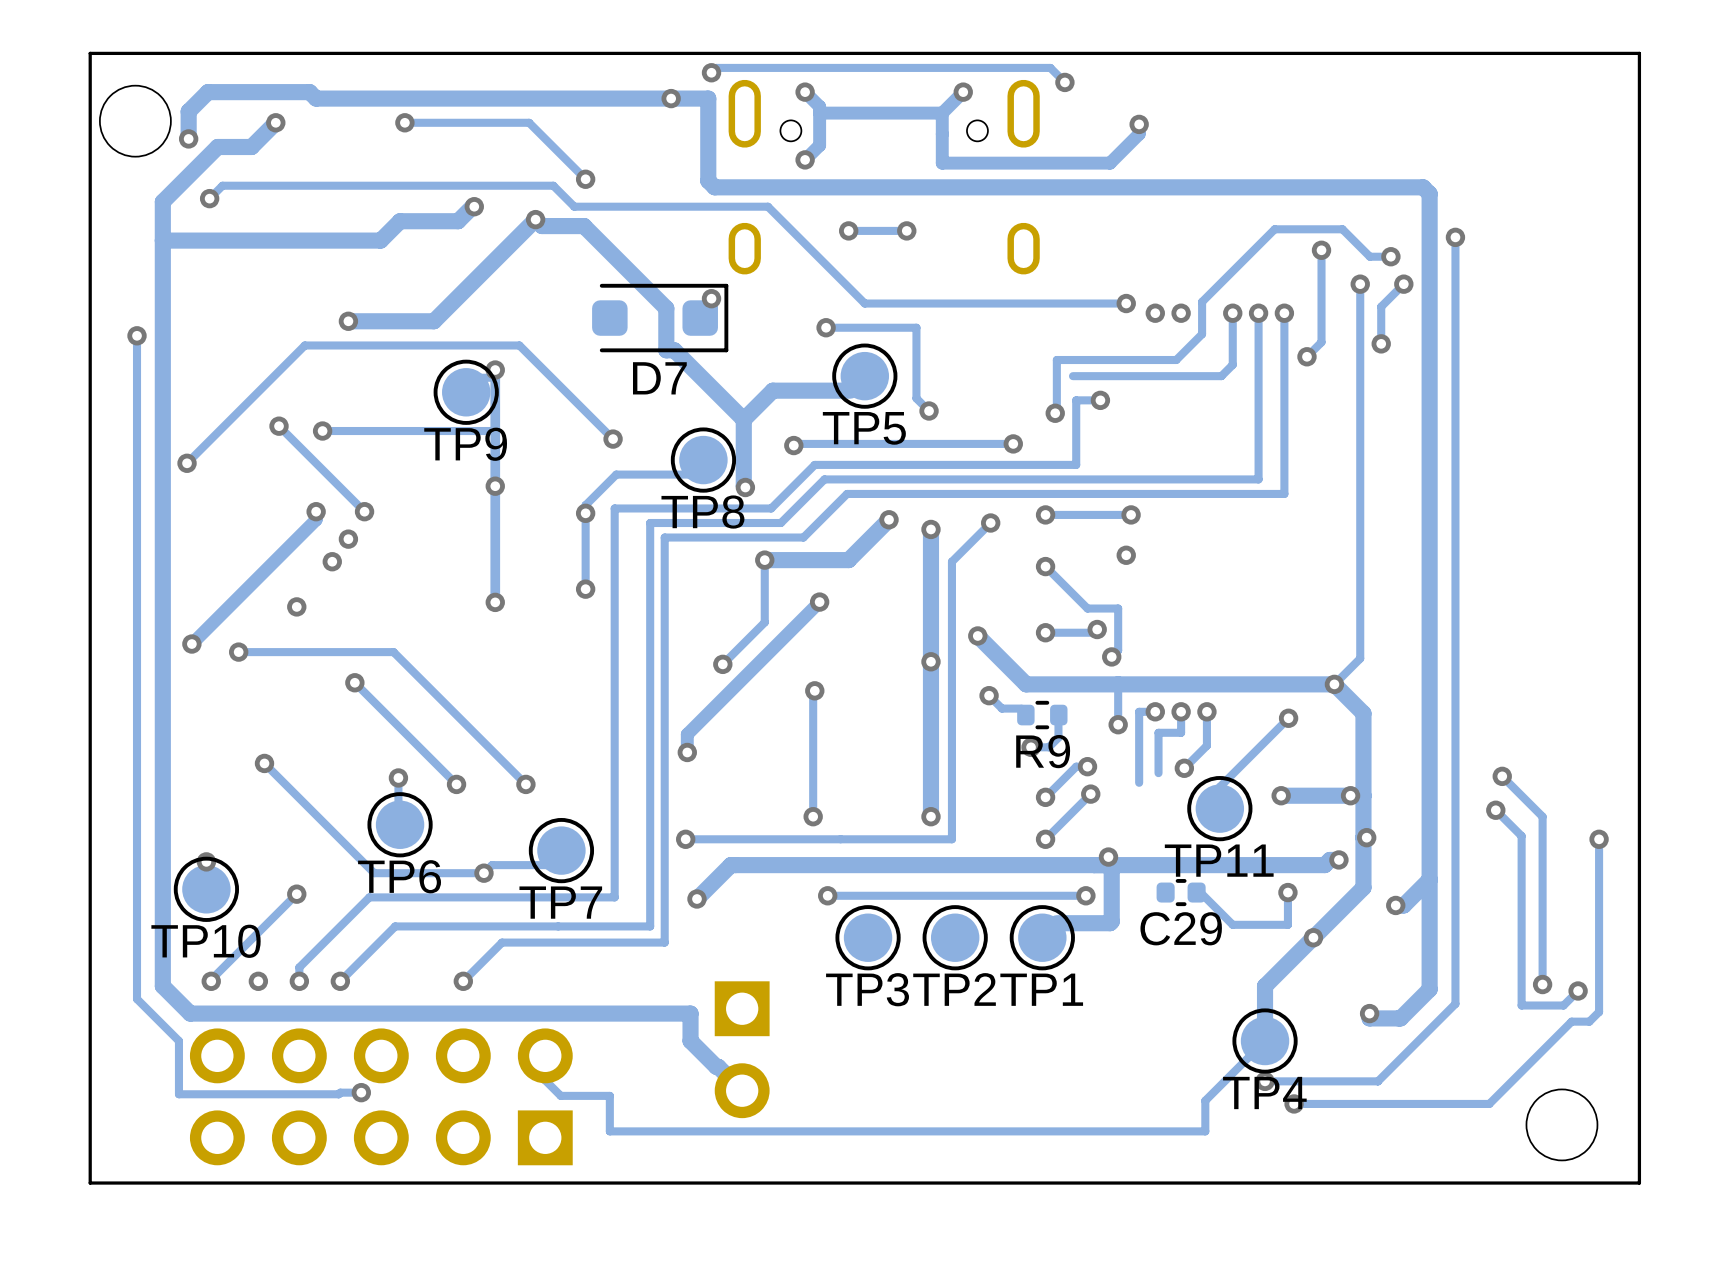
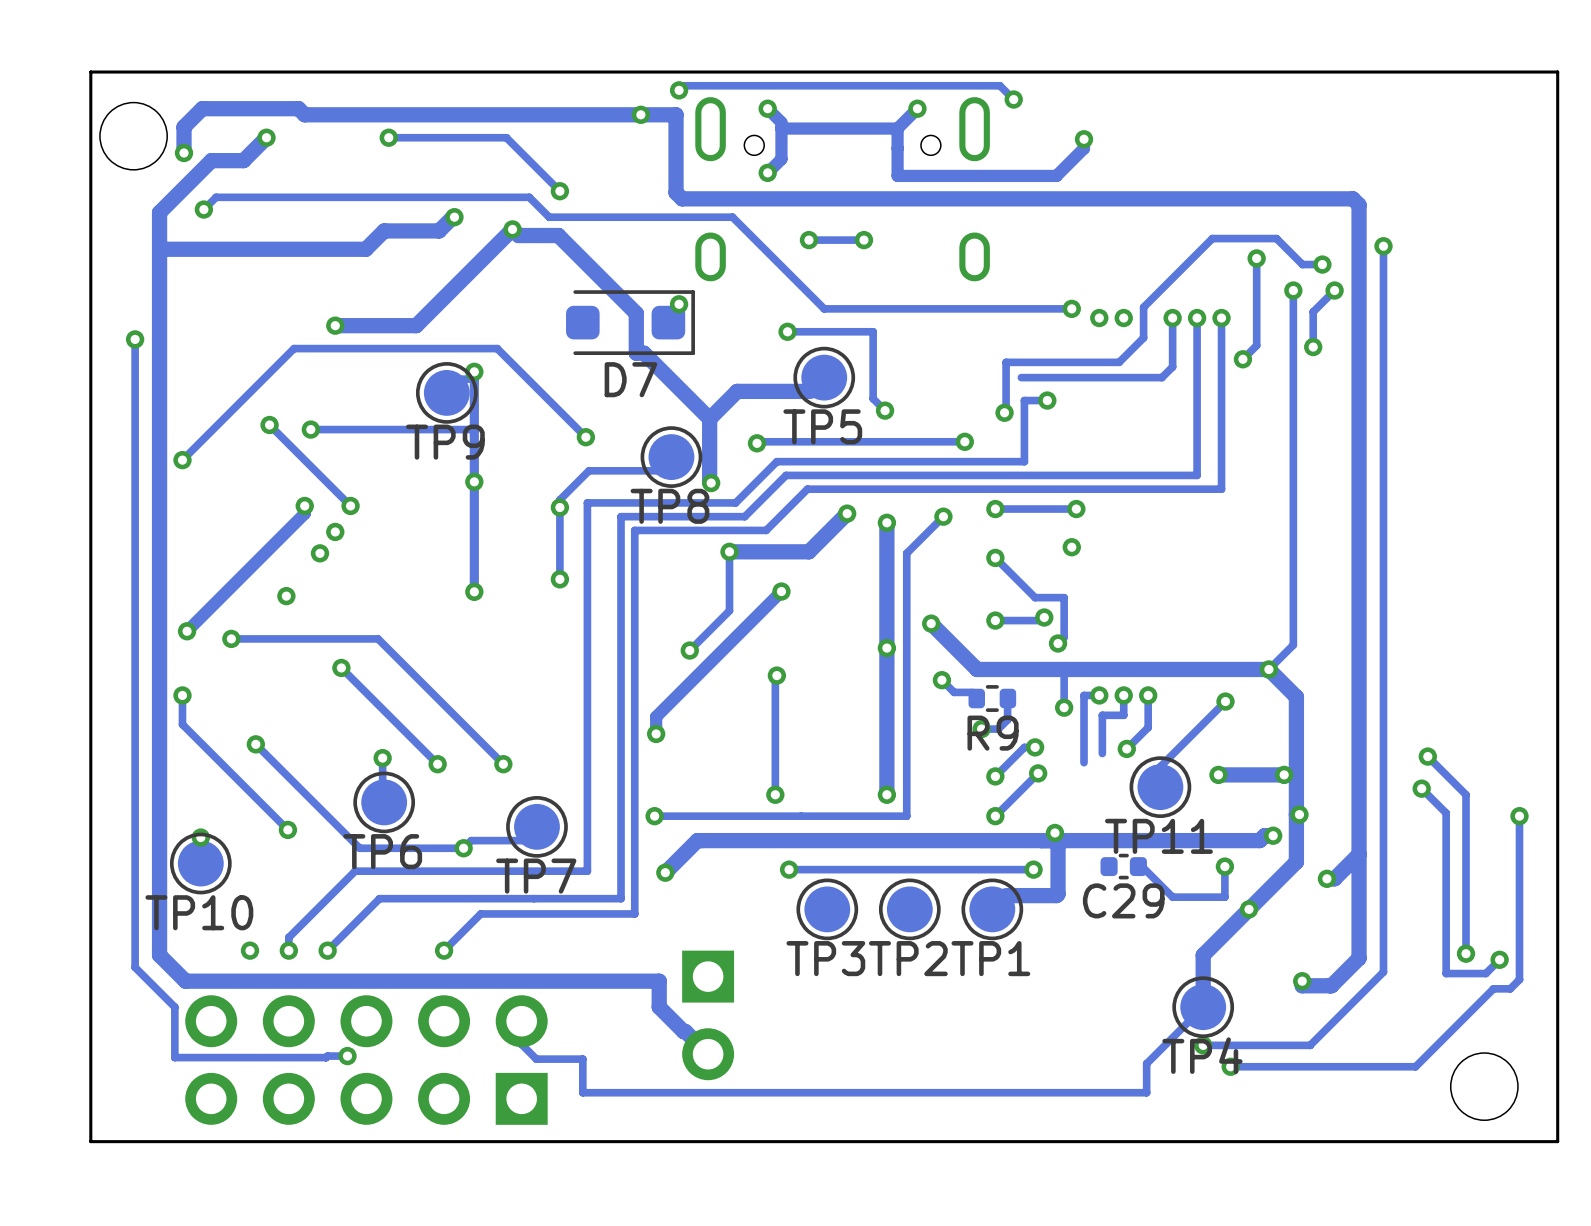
track: none -> (182, 695) (182, 724) (287, 829)
via: none -> (182, 695)
track: (296, 894) (211, 981) -> none
via position: (296, 894) -> (287, 829)
via: (211, 981) -> none

